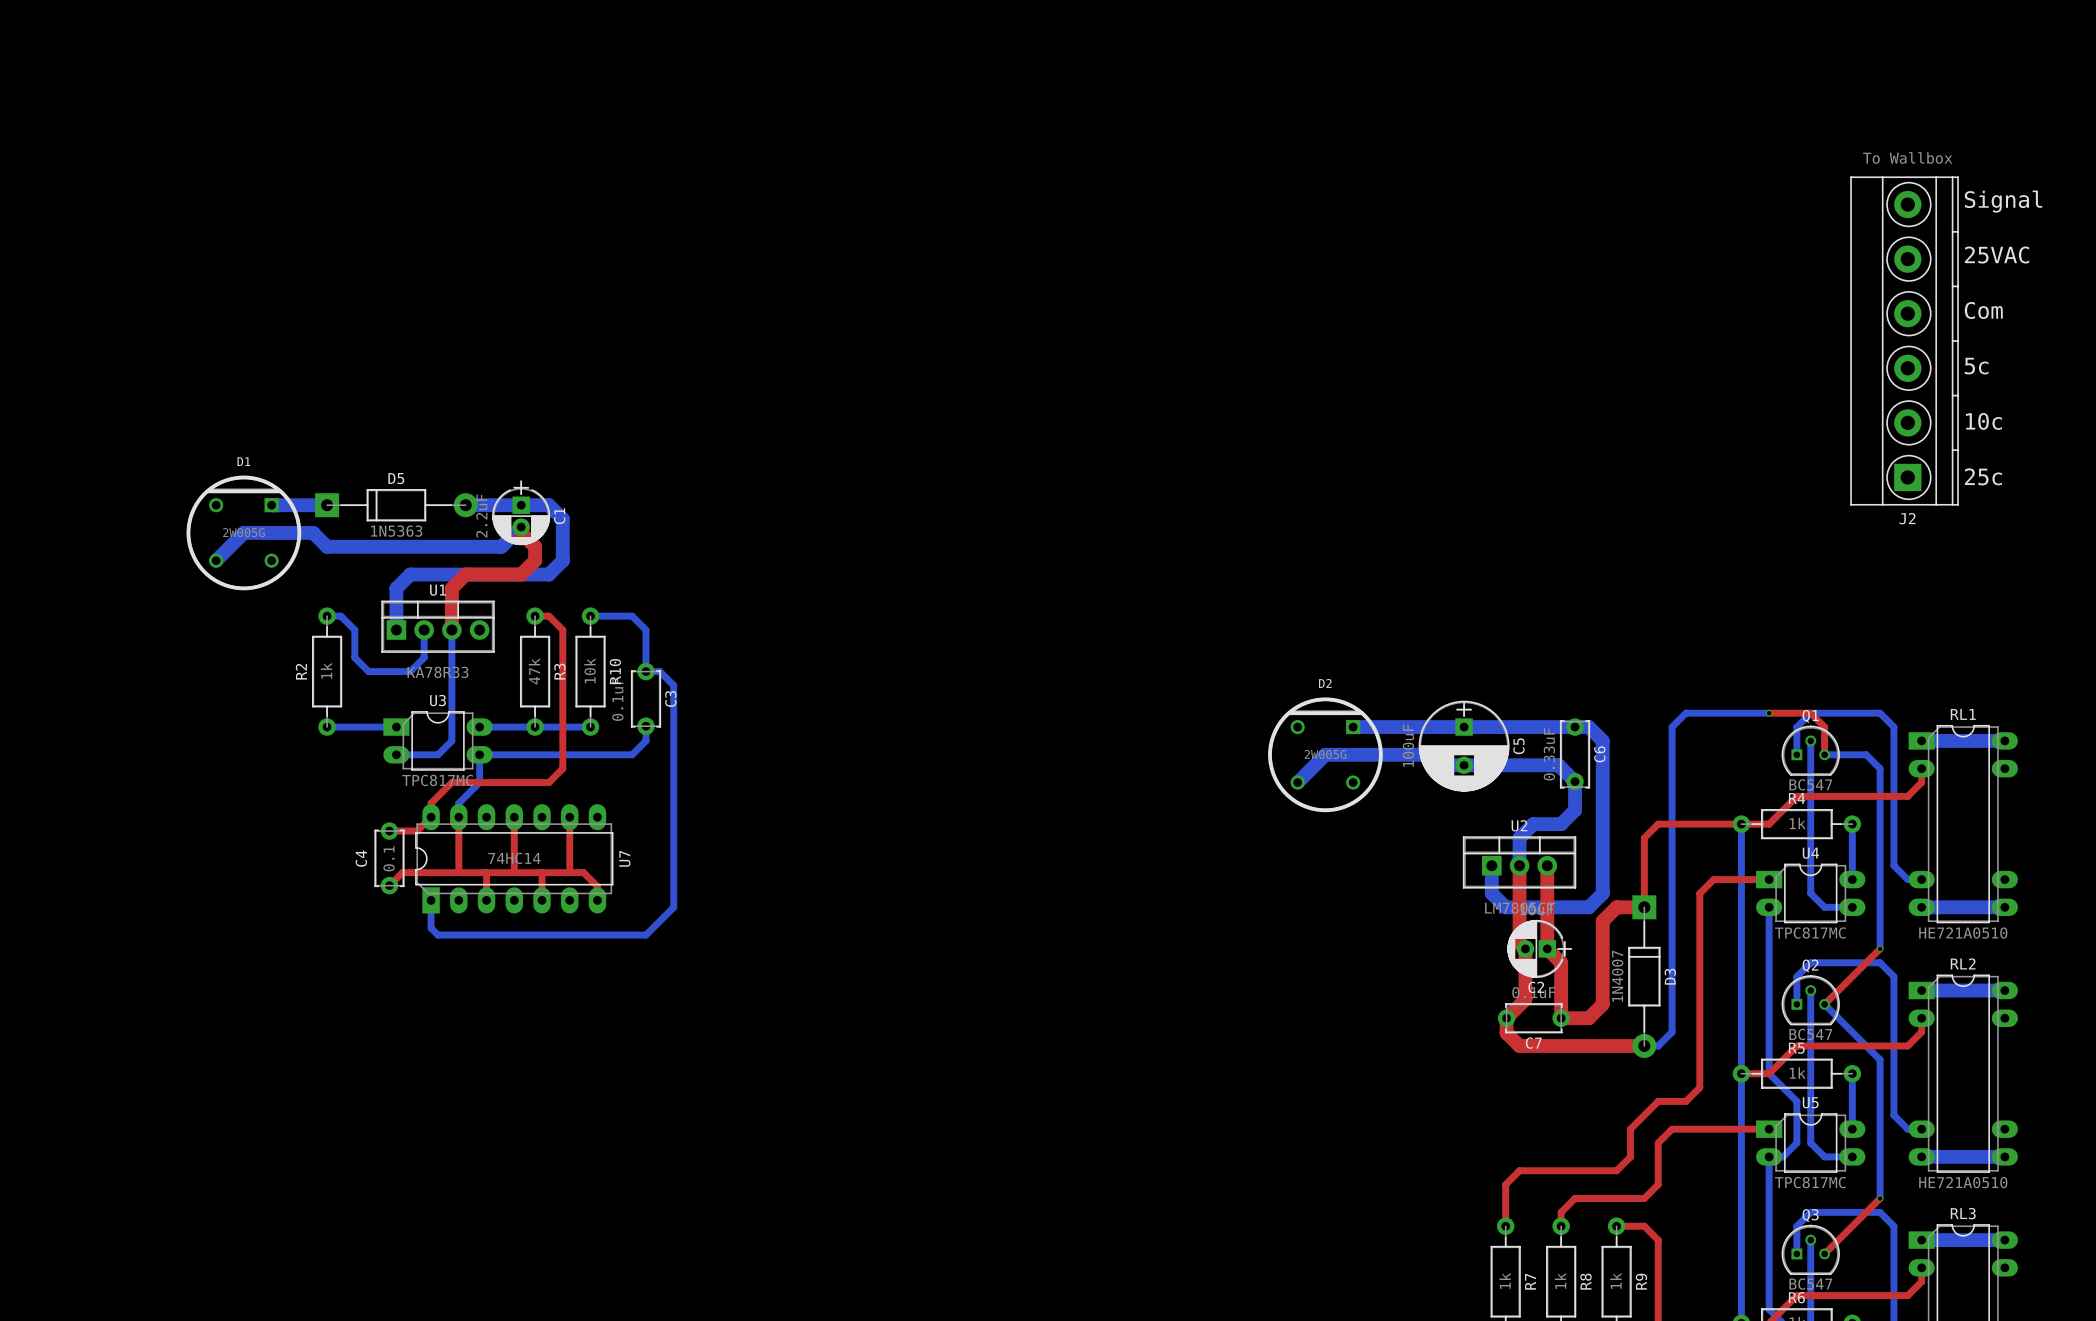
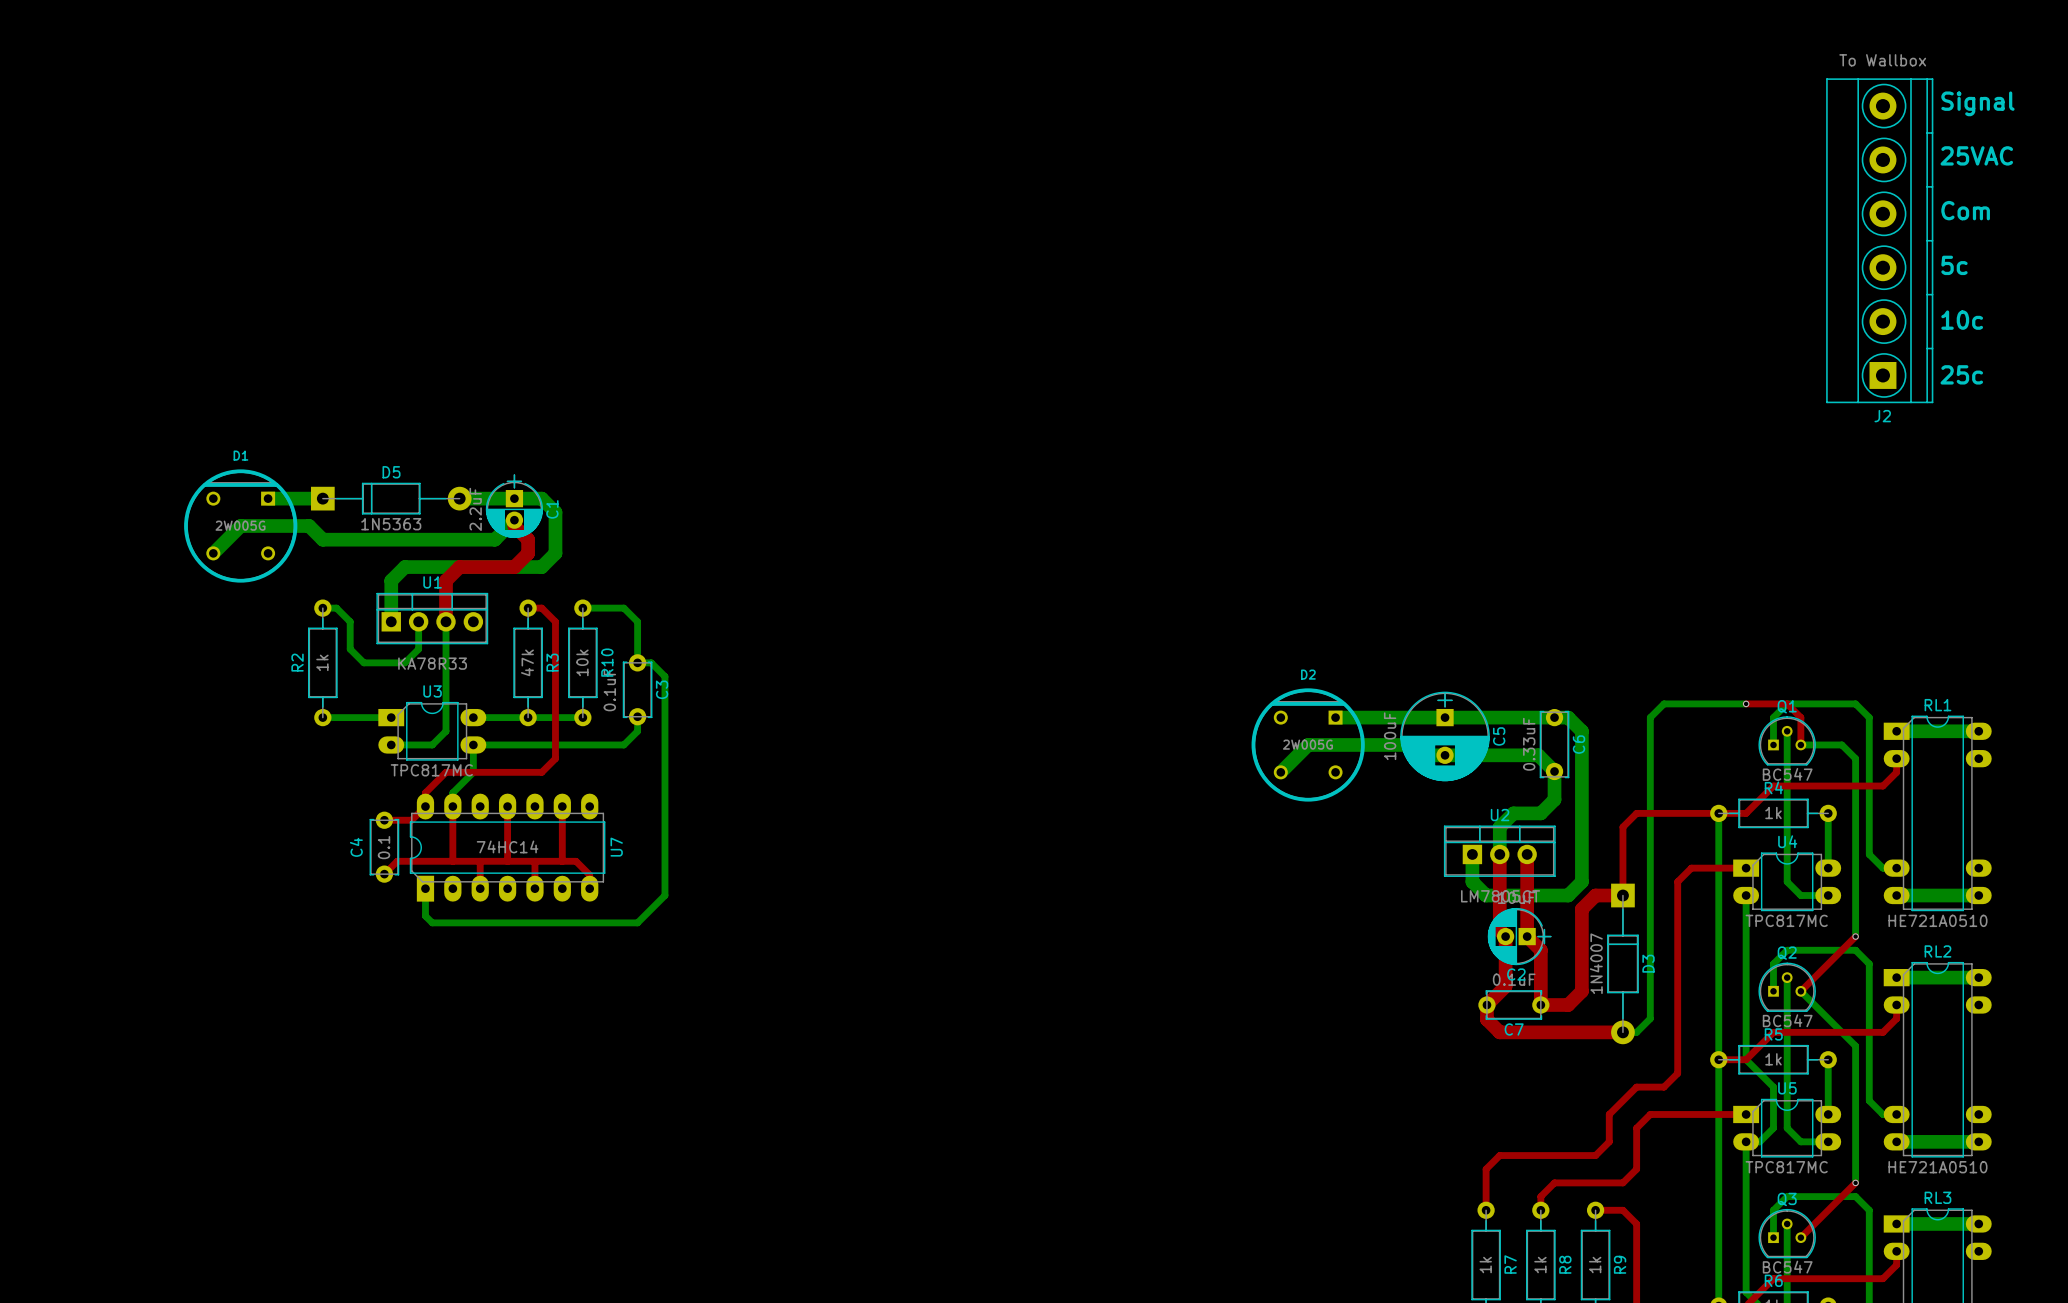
text position: Signal (2003, 201) -> Signal (1977, 103)
text position: 25VAC (1997, 255) -> 25VAC (1976, 155)
text position: Com (1983, 310) -> Com (1965, 210)
J2 position: (1904, 341) -> (1879, 240)
text position: 5c (1976, 366) -> 5c (1954, 265)
text position: 10c (1983, 421) -> 10c (1962, 320)
text position: 25c (1983, 476) -> 25c (1961, 374)

